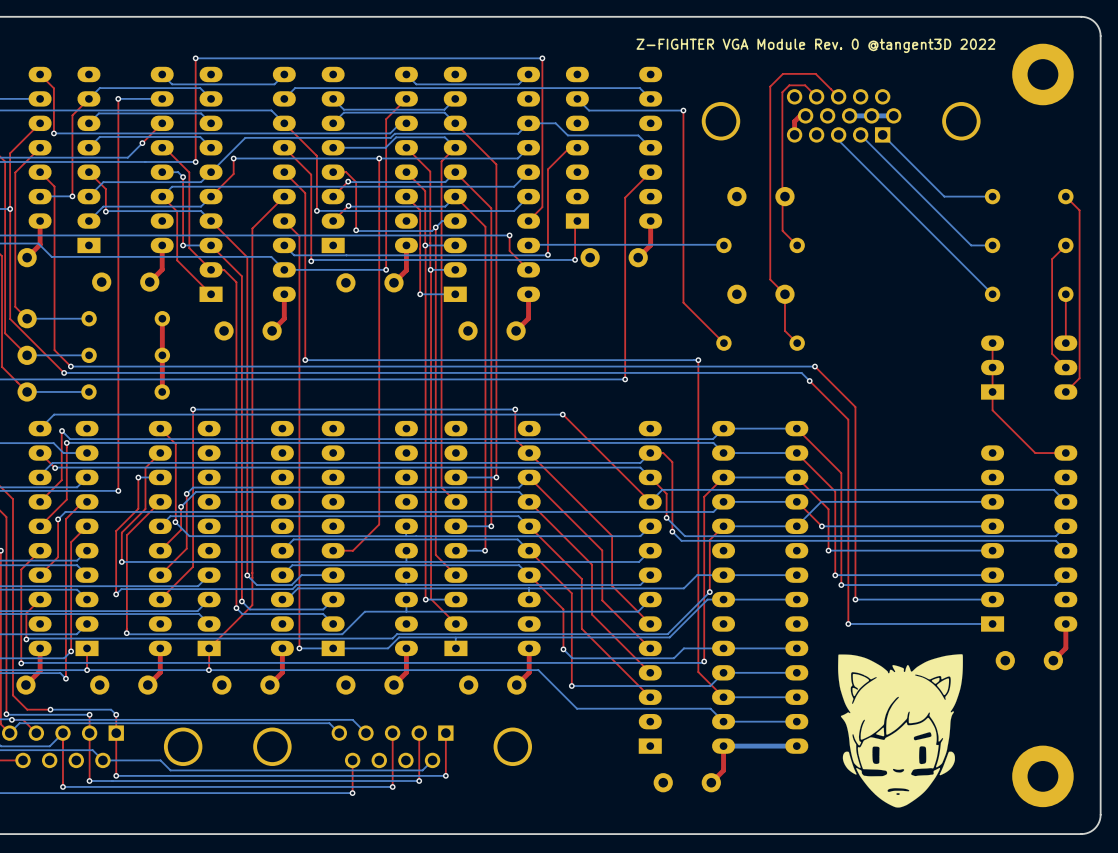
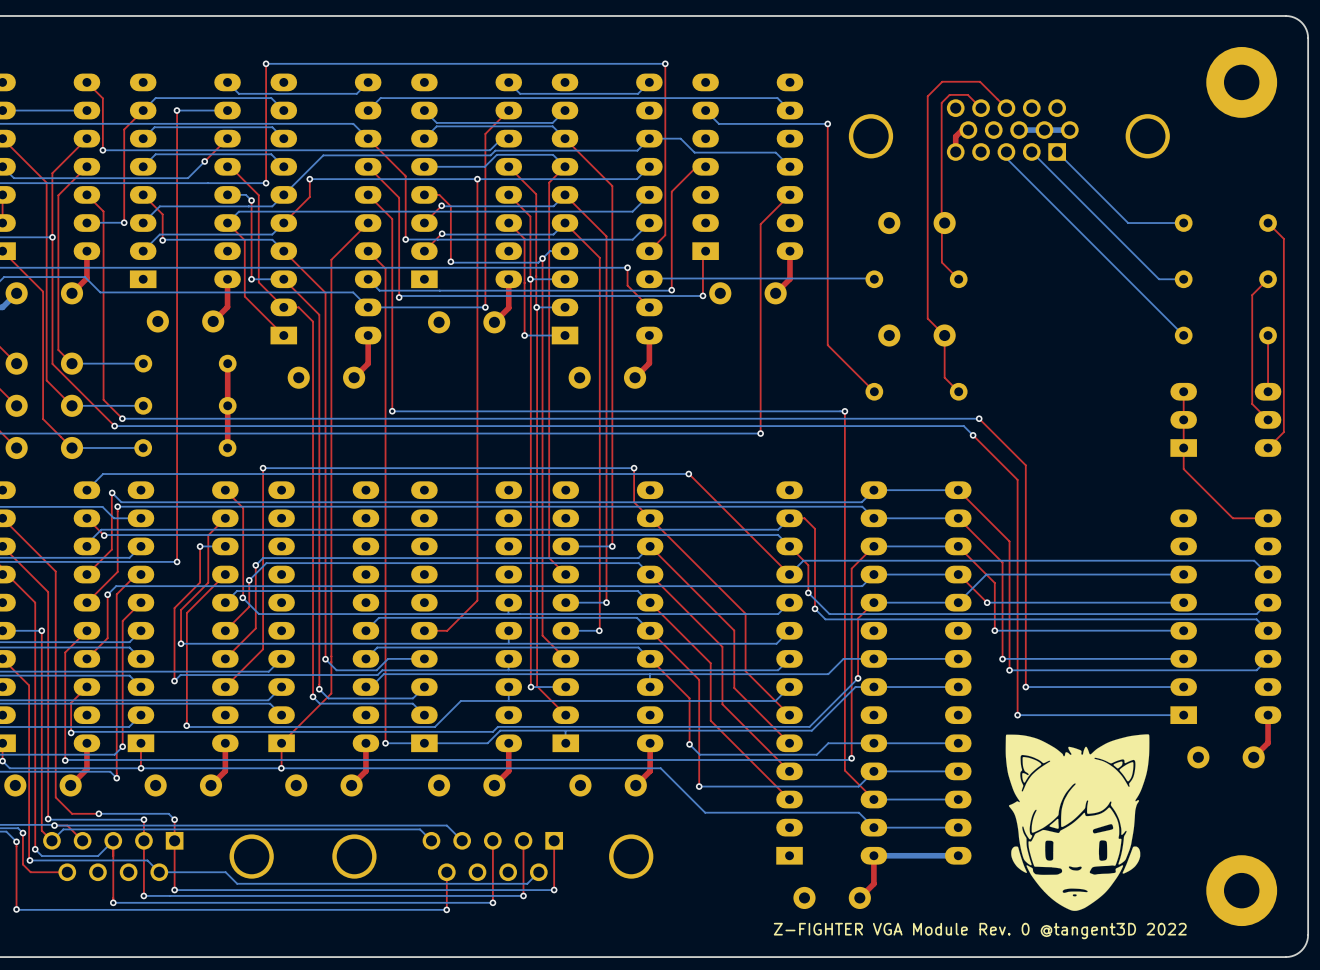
text: Z-FIGHTER VGA Module Rev. 0 @tangent3D 2022 (815, 45) -> none
drawing position: (900, 730) -> (1077, 822)
text: none -> Z-FIGHTER VGA Module Rev. 0 @tangent3D 2022 (980, 931)

